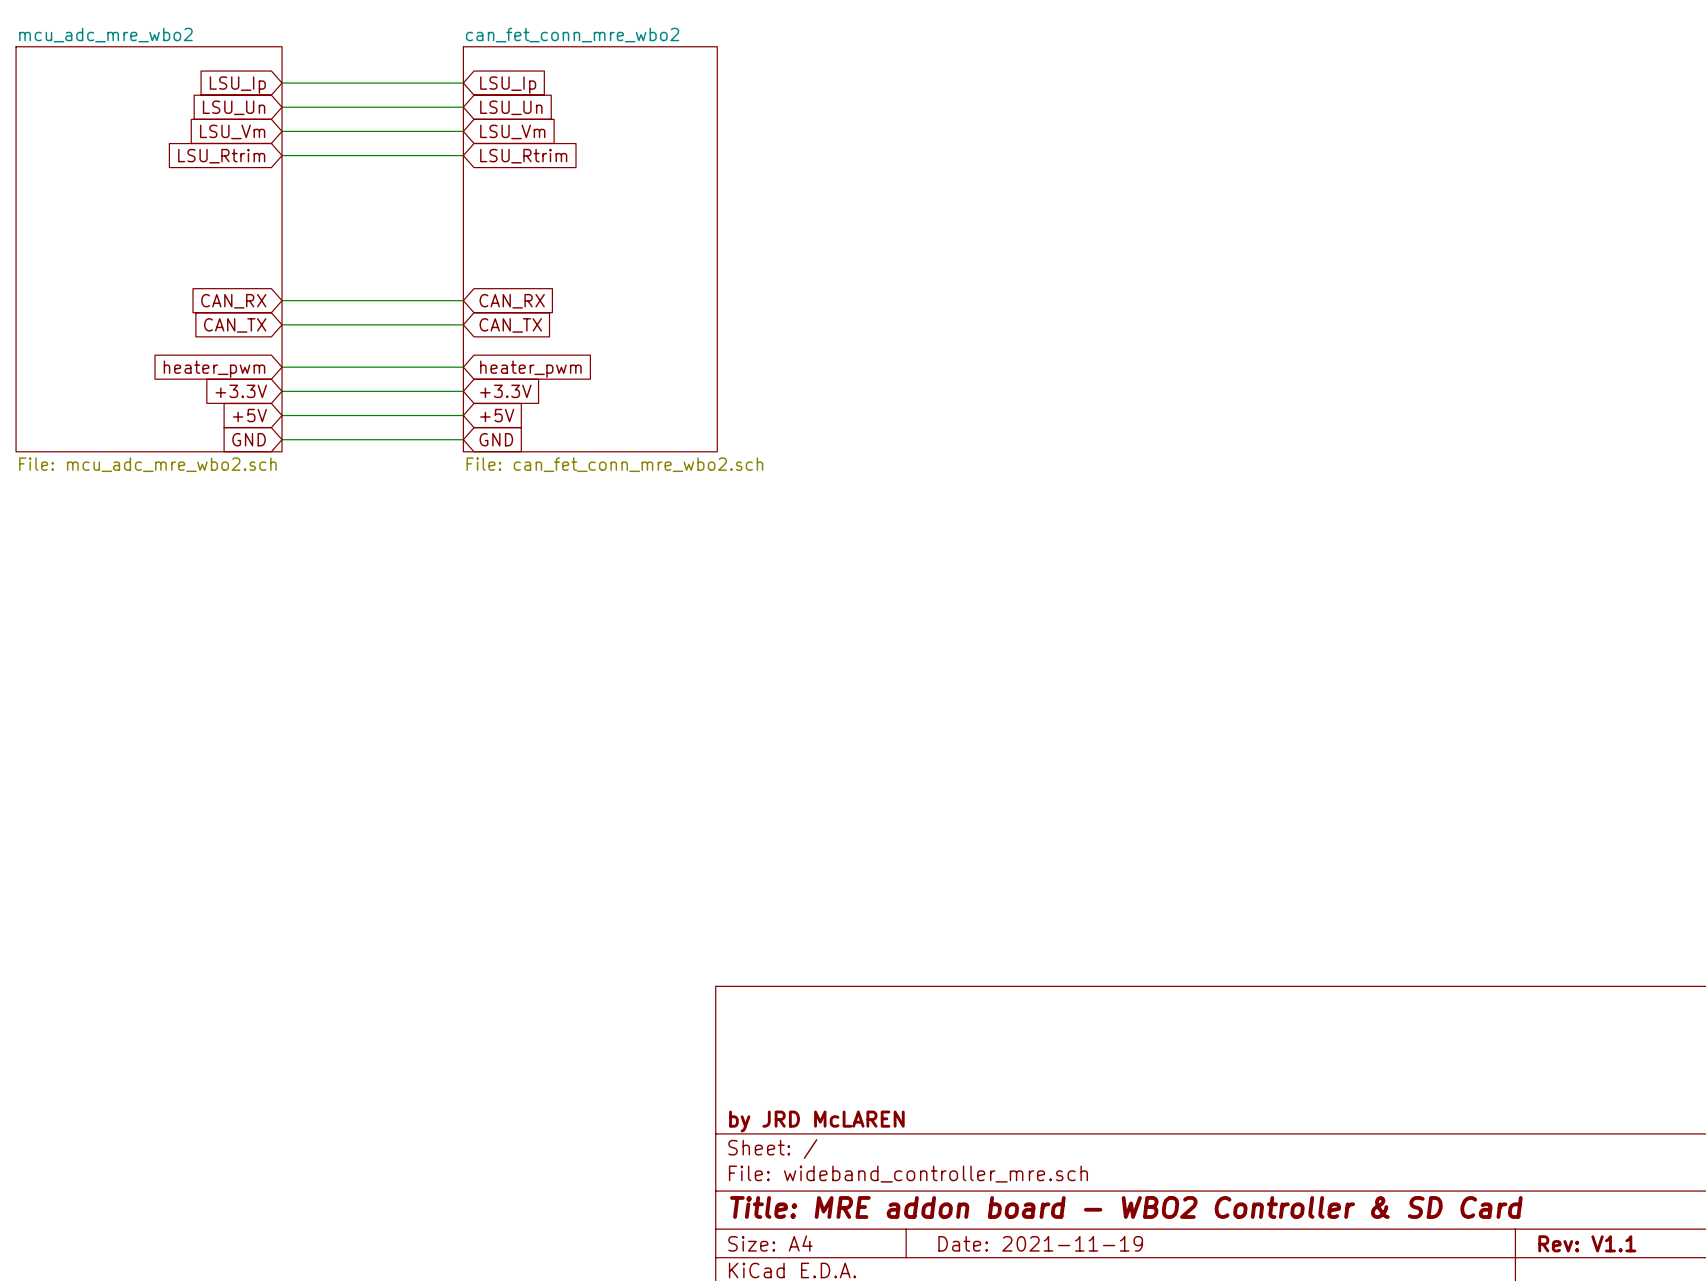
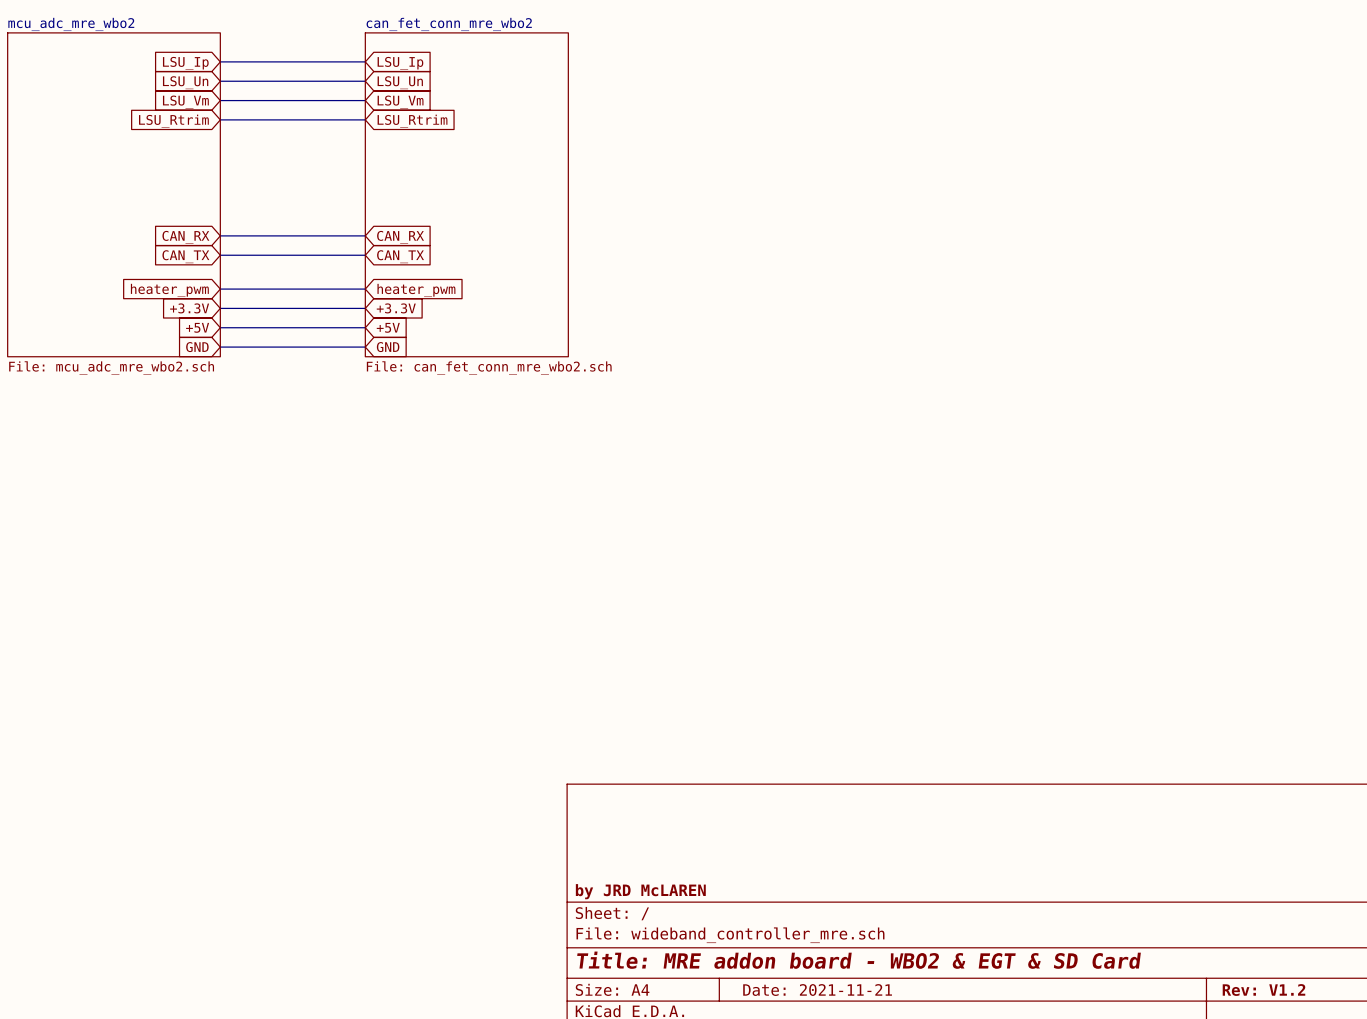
title block: Title: MRE addon board - WBO2 Controller & SD Card (1126, 1207) -> Title: MRE addon board - WBO2 & EGT & SD Card (859, 960)
title block: Date: 2021-11-19 (1040, 1243) -> Date: 2021-11-21 (817, 990)
title block: Rev: V1.1 (1587, 1243) -> Rev: V1.2 (1263, 990)

